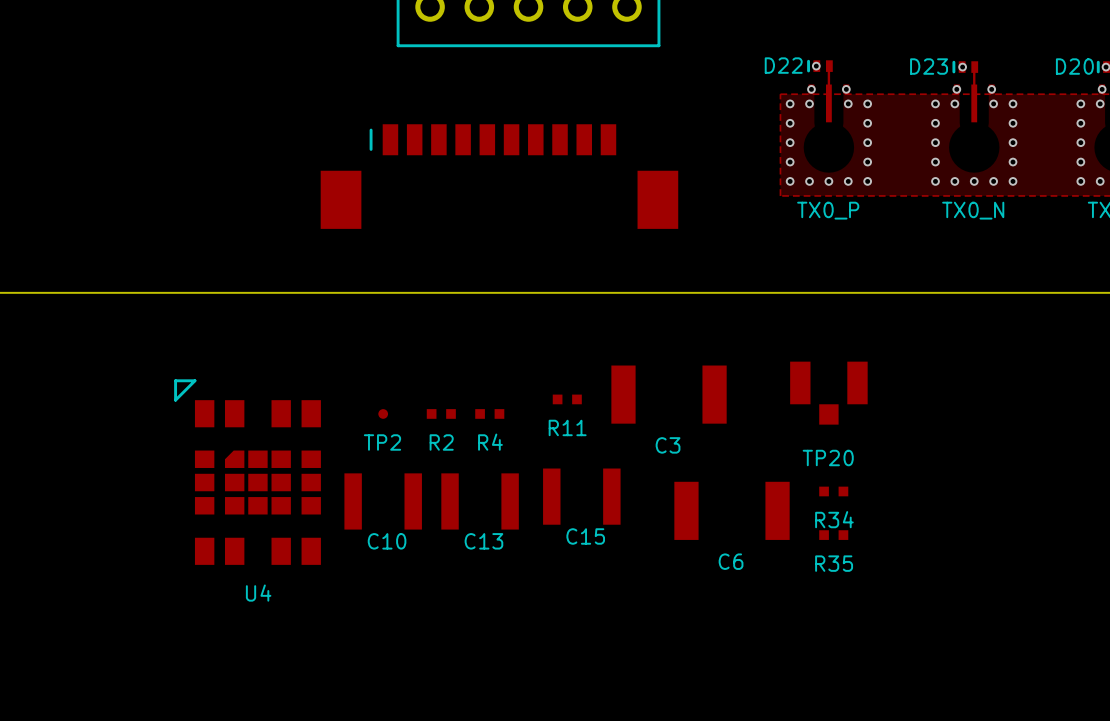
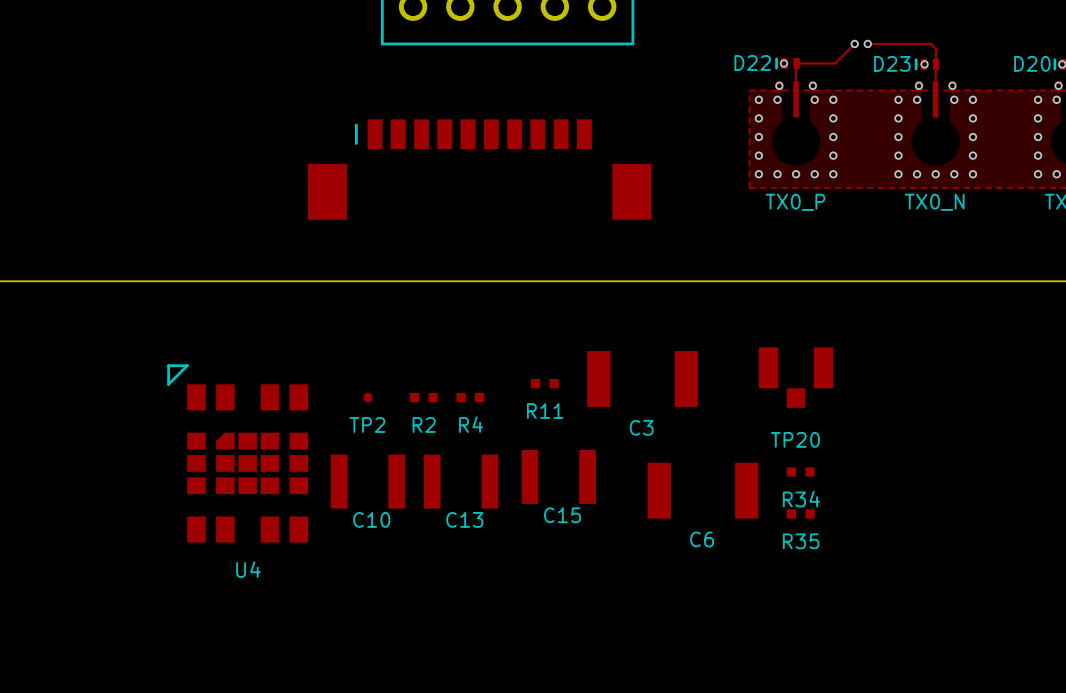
track: none -> (854, 43) (835, 63) (796, 63)
via: none -> (854, 43)
track: none -> (867, 43) (931, 43) (936, 49) (936, 64)
via: none -> (867, 43)

